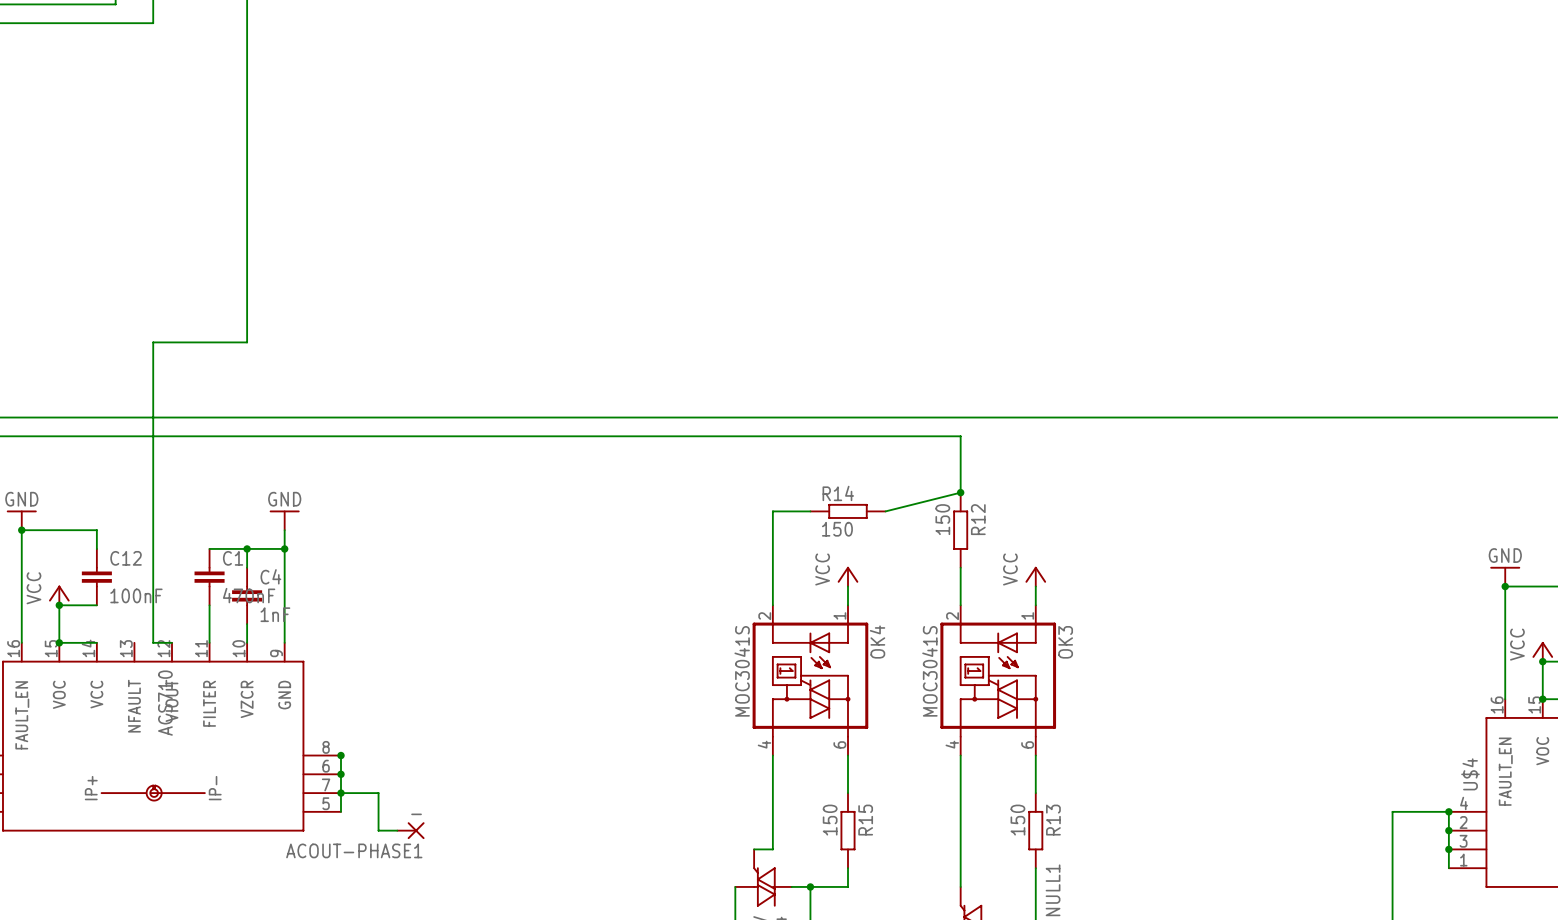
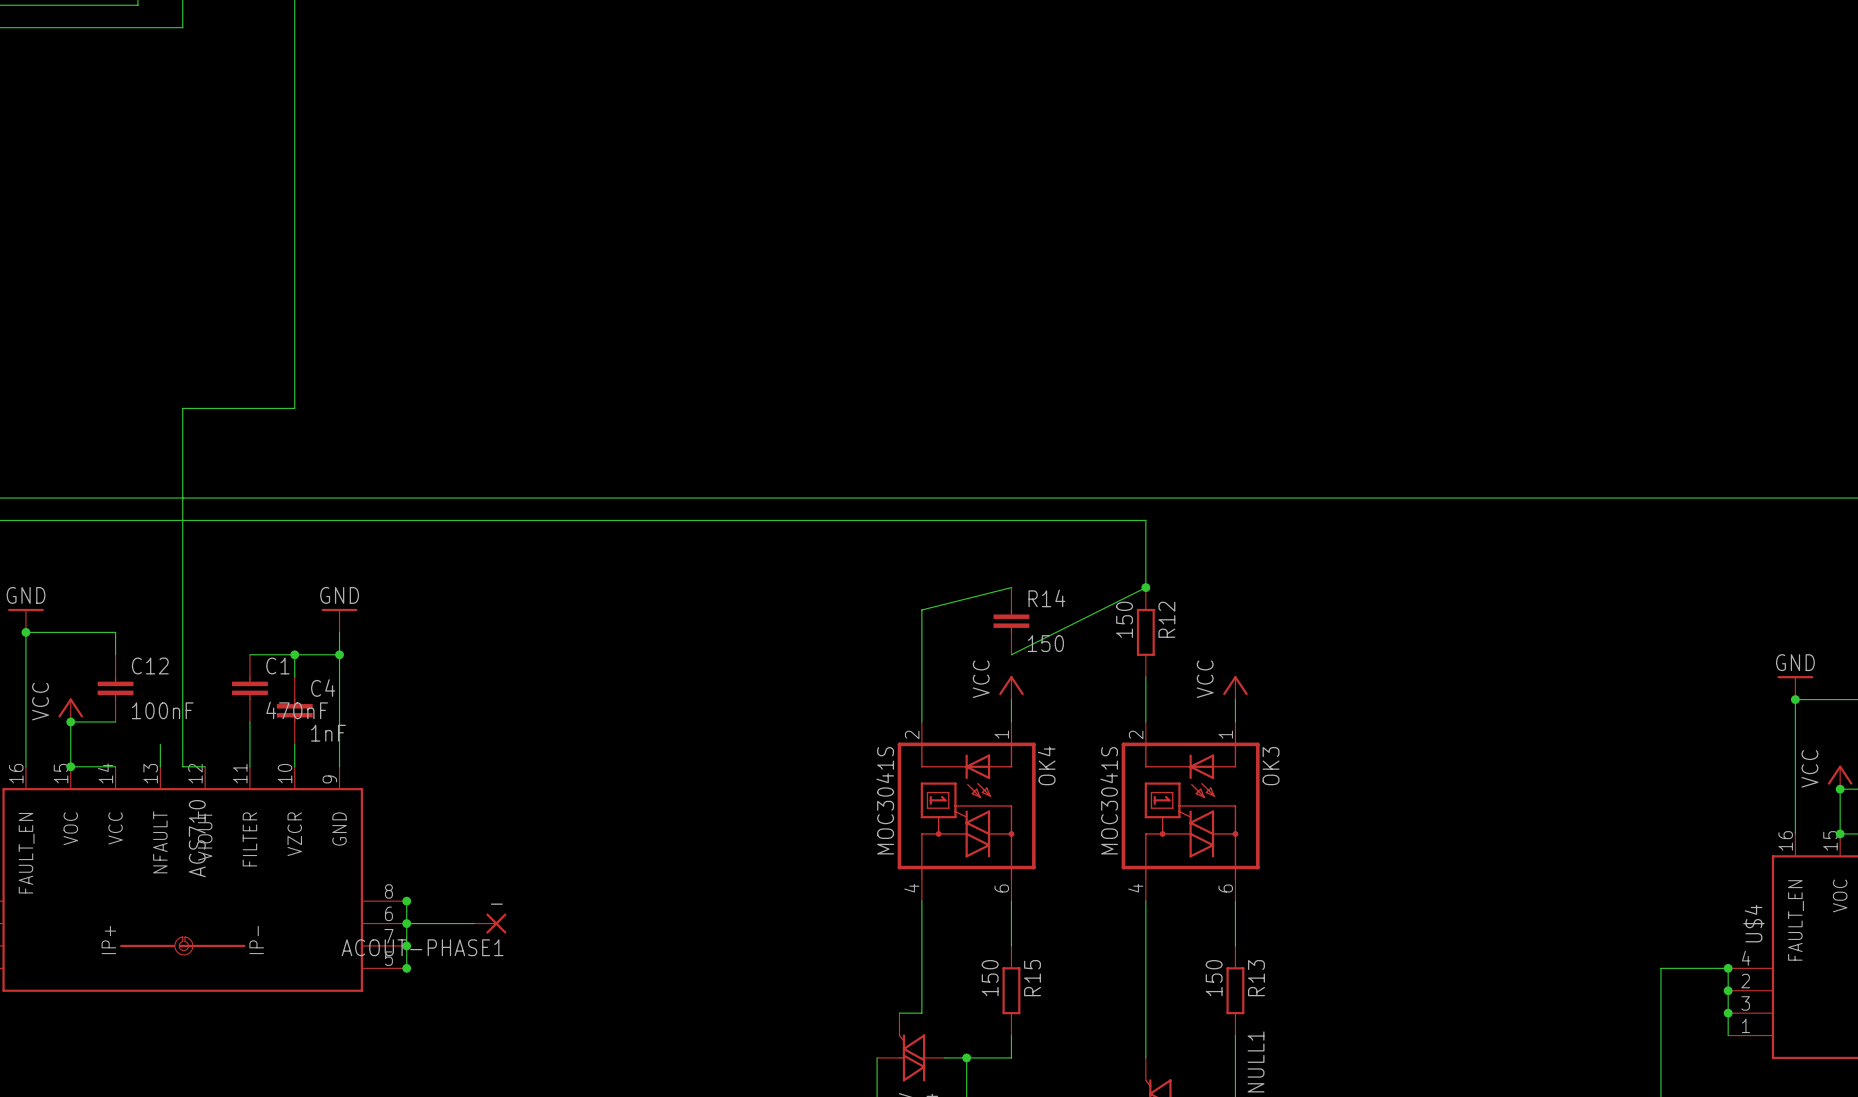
wire: (960, 492) (885, 511) -> (1145, 587) (1011, 654)
R14 name position: R14 (838, 493) -> R14 (1046, 598)
R14 symbol: [810, 503, 886, 519] -> [993, 587, 1030, 655]
wire: (772, 511) (810, 511) -> (921, 609) (1011, 587)
R14 value position: 150 (837, 529) -> 150 (1045, 643)
wire: none -> (160, 744) (160, 766)
wire: none -> (406, 923) (473, 923)
wire: (340, 793) (378, 793) (378, 830) (397, 830) -> none
junction: none -> (406, 968)
ACOUT-PHASE1 position: (410, 830) -> (490, 923)

